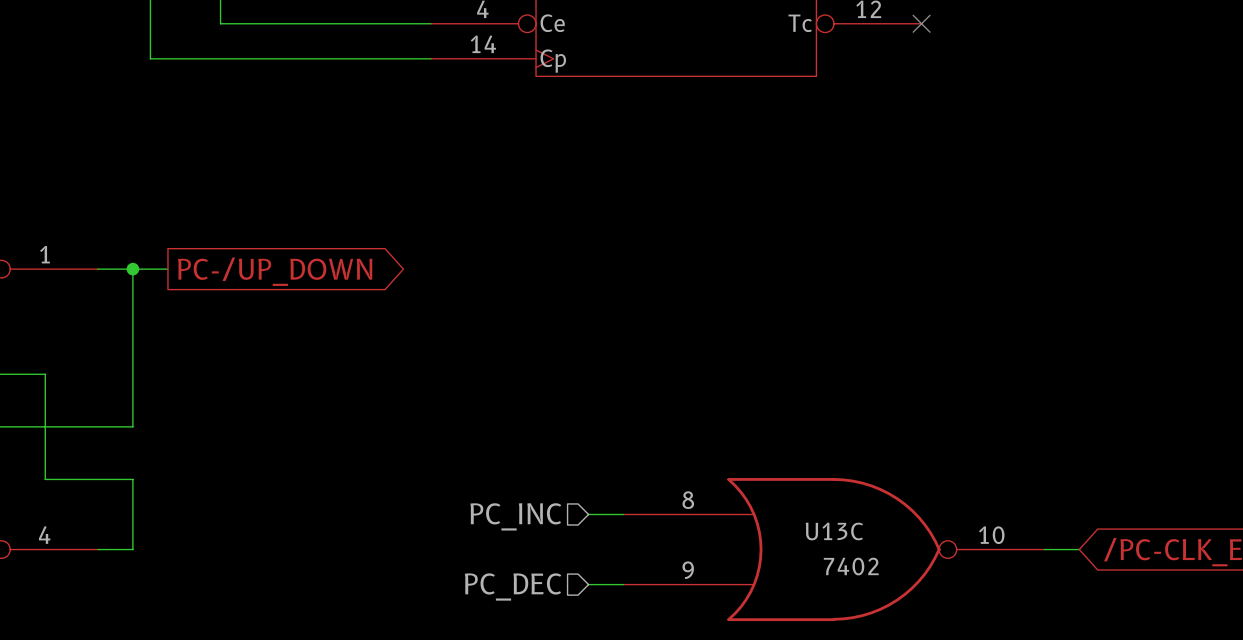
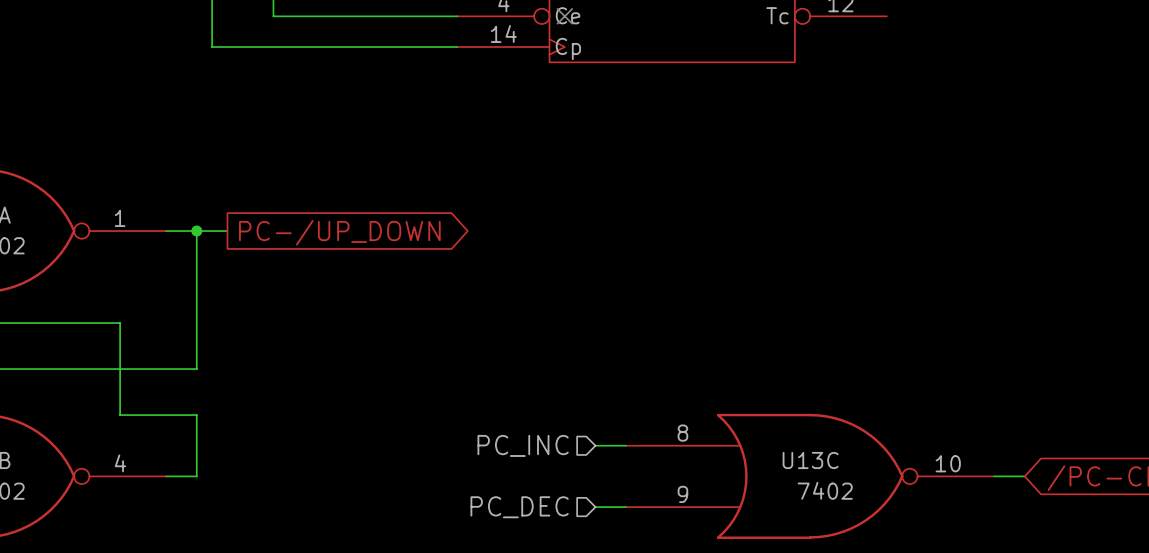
no-connect mark: none -> (564, 16)
no-connect mark: (921, 23) -> none

